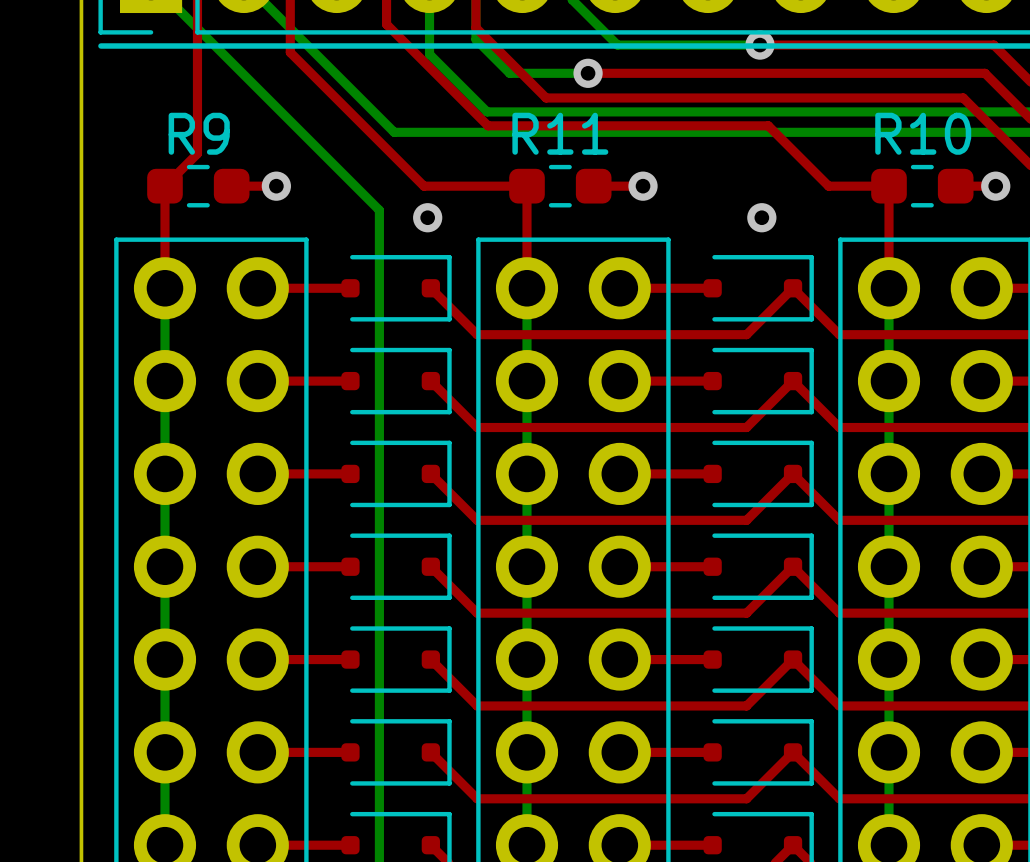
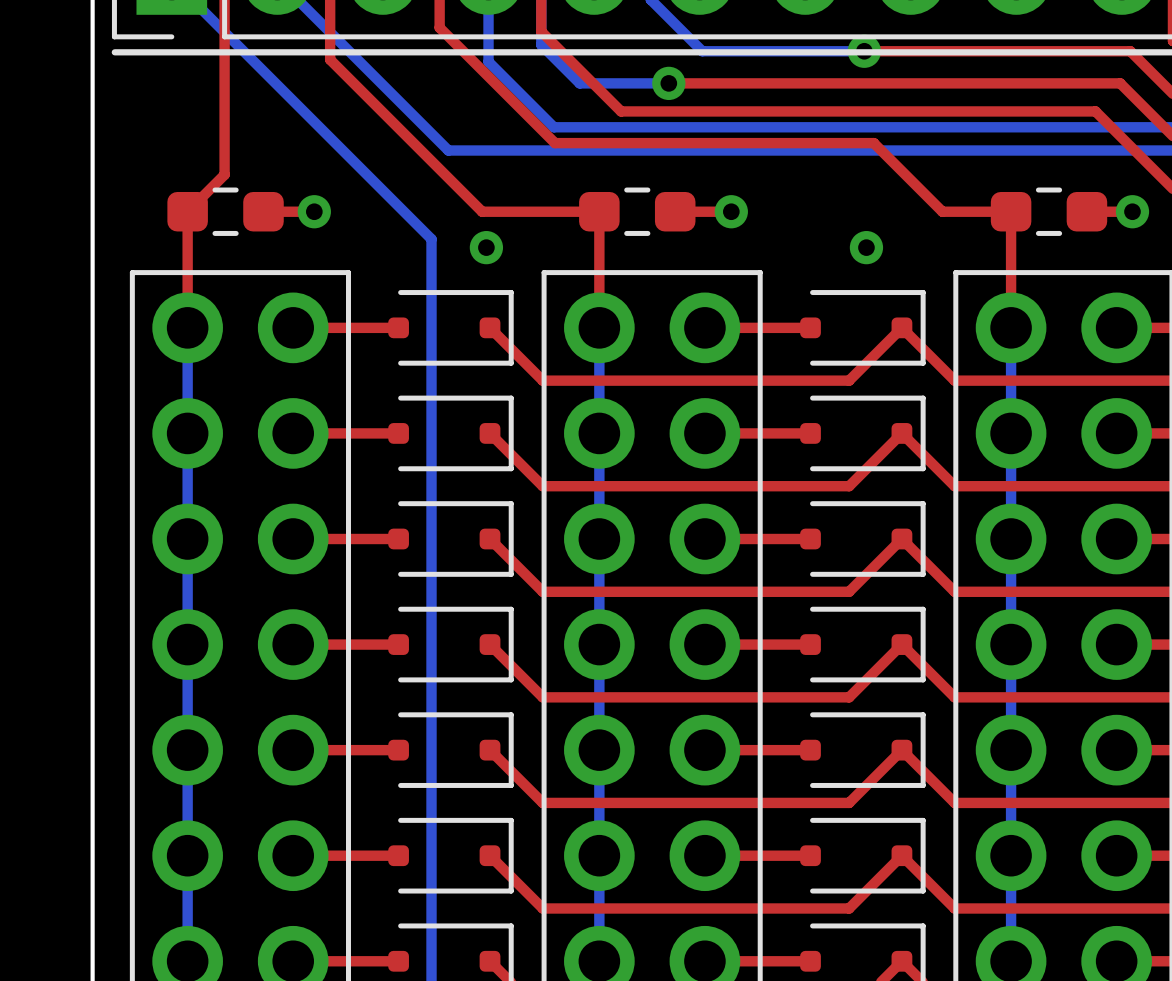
R9 name: R9 (199, 133) -> none
R11 name: R11 (560, 133) -> none
R10 name: R10 (923, 133) -> none

